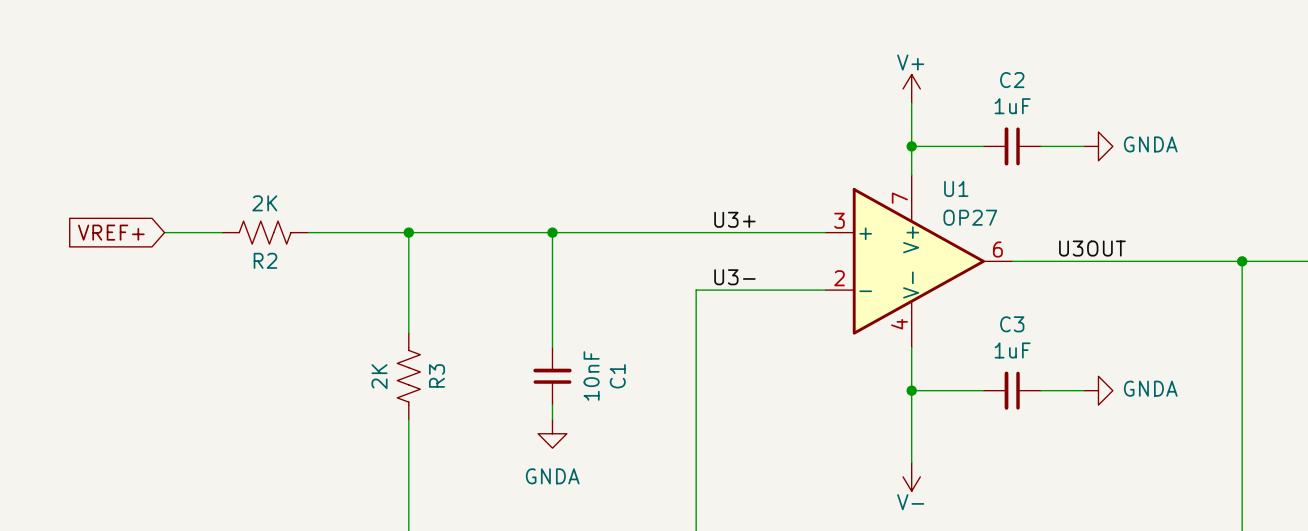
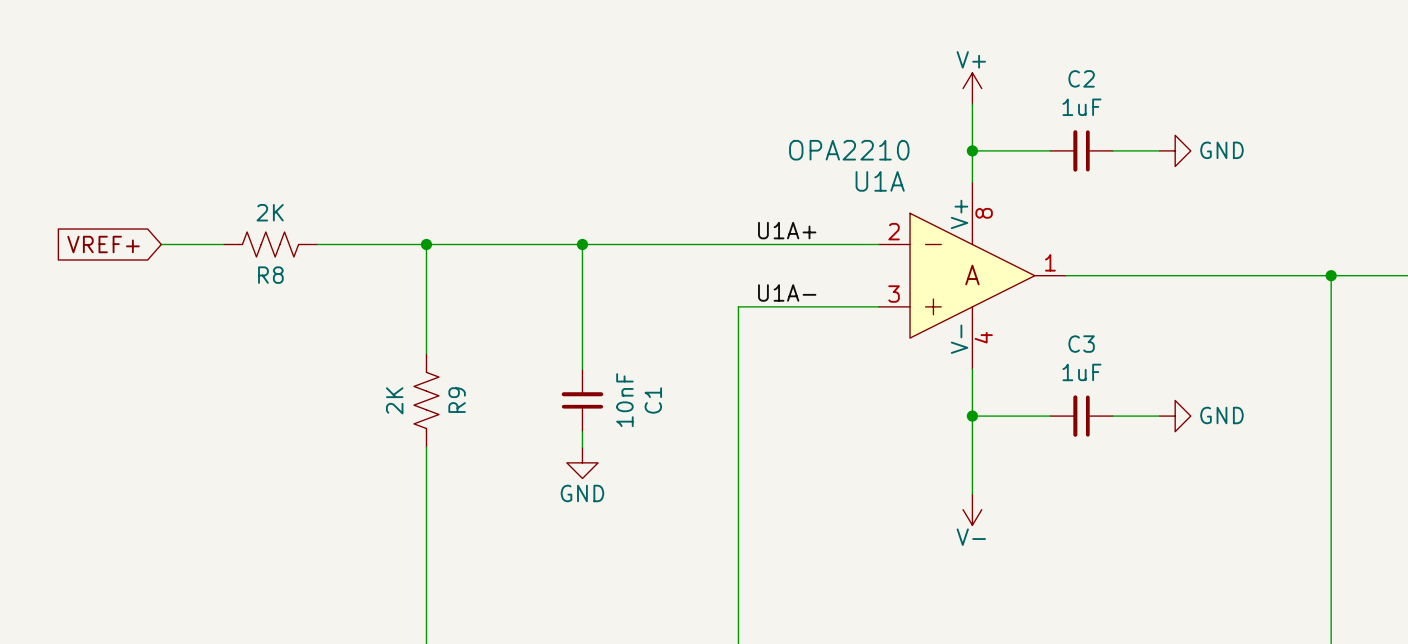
power symbol: GNDA (1098, 146) -> GND (1175, 150)
label: U3+ (734, 219) -> U1A+ (787, 230)
label: U3OUT (1092, 248) -> none
R2 name: R2 (265, 260) -> R8 (270, 275)
U1A: none -> OPA2210 (972, 275)
U1: OP27 (918, 261) -> none
label: U3- (734, 277) -> U1A- (787, 292)
R3 name: R3 (437, 375) -> R9 (457, 400)
power symbol: GNDA (1098, 390) -> GND (1175, 416)
power symbol: GNDA (552, 433) -> GND (582, 462)

